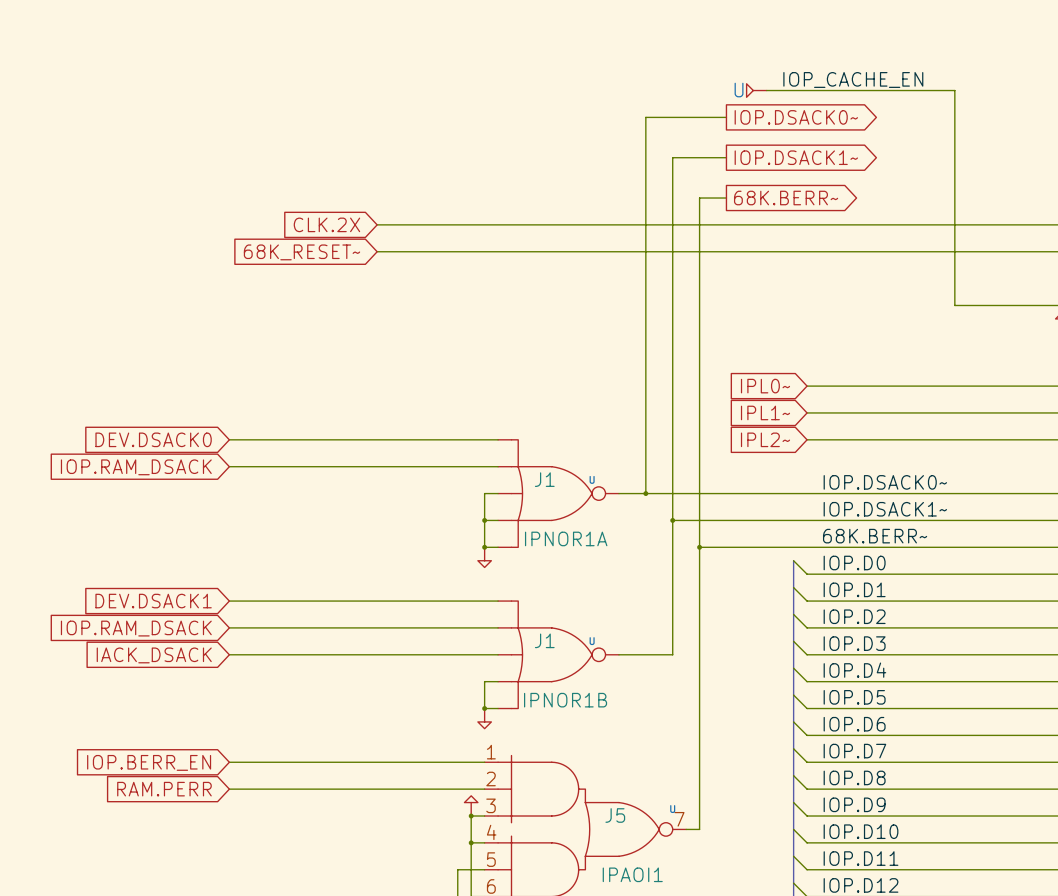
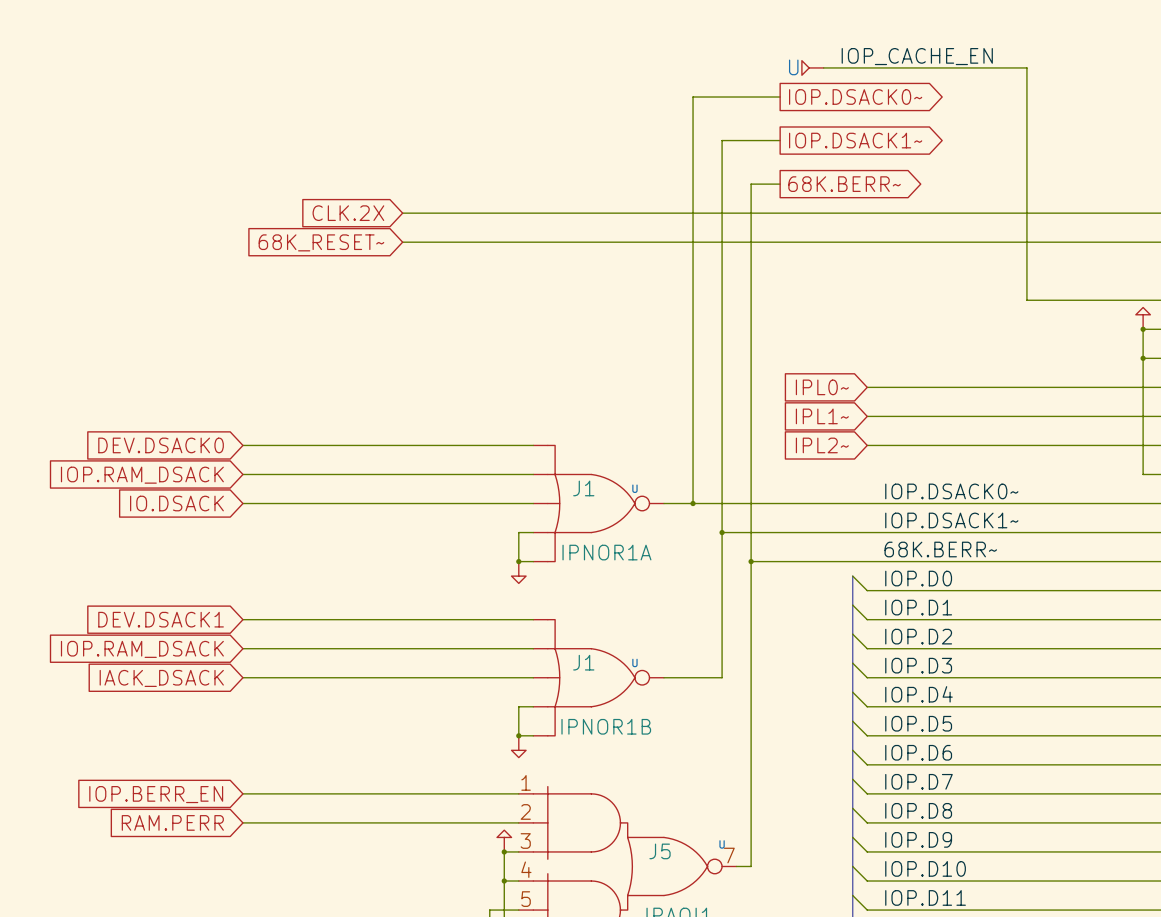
global label: none -> IO.DSACK (176, 503)
wire: (484, 493) (484, 520) -> (518, 503) (242, 503)
junction: (484, 520) -> none

